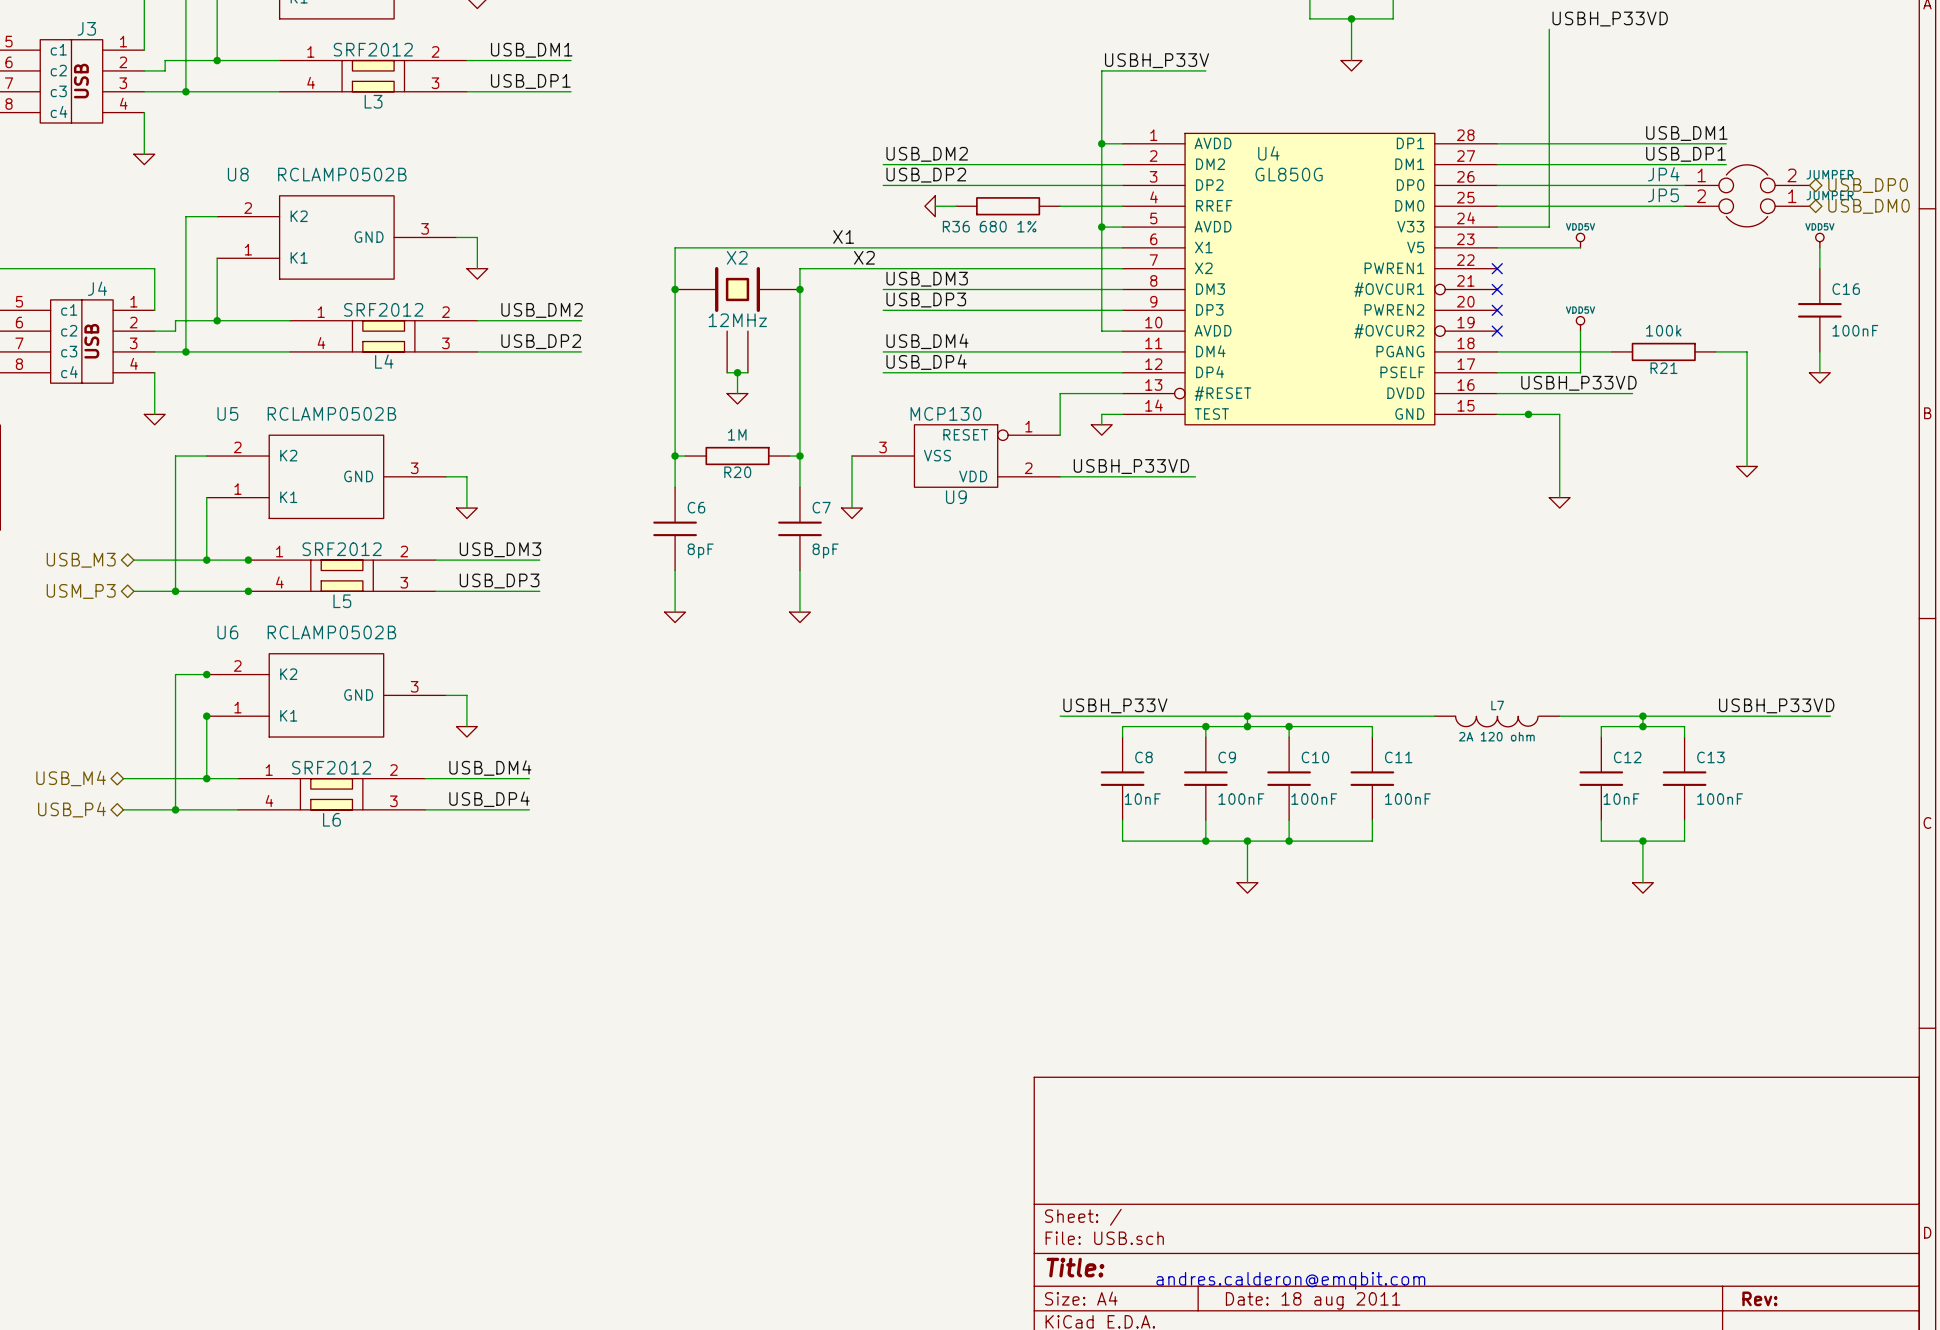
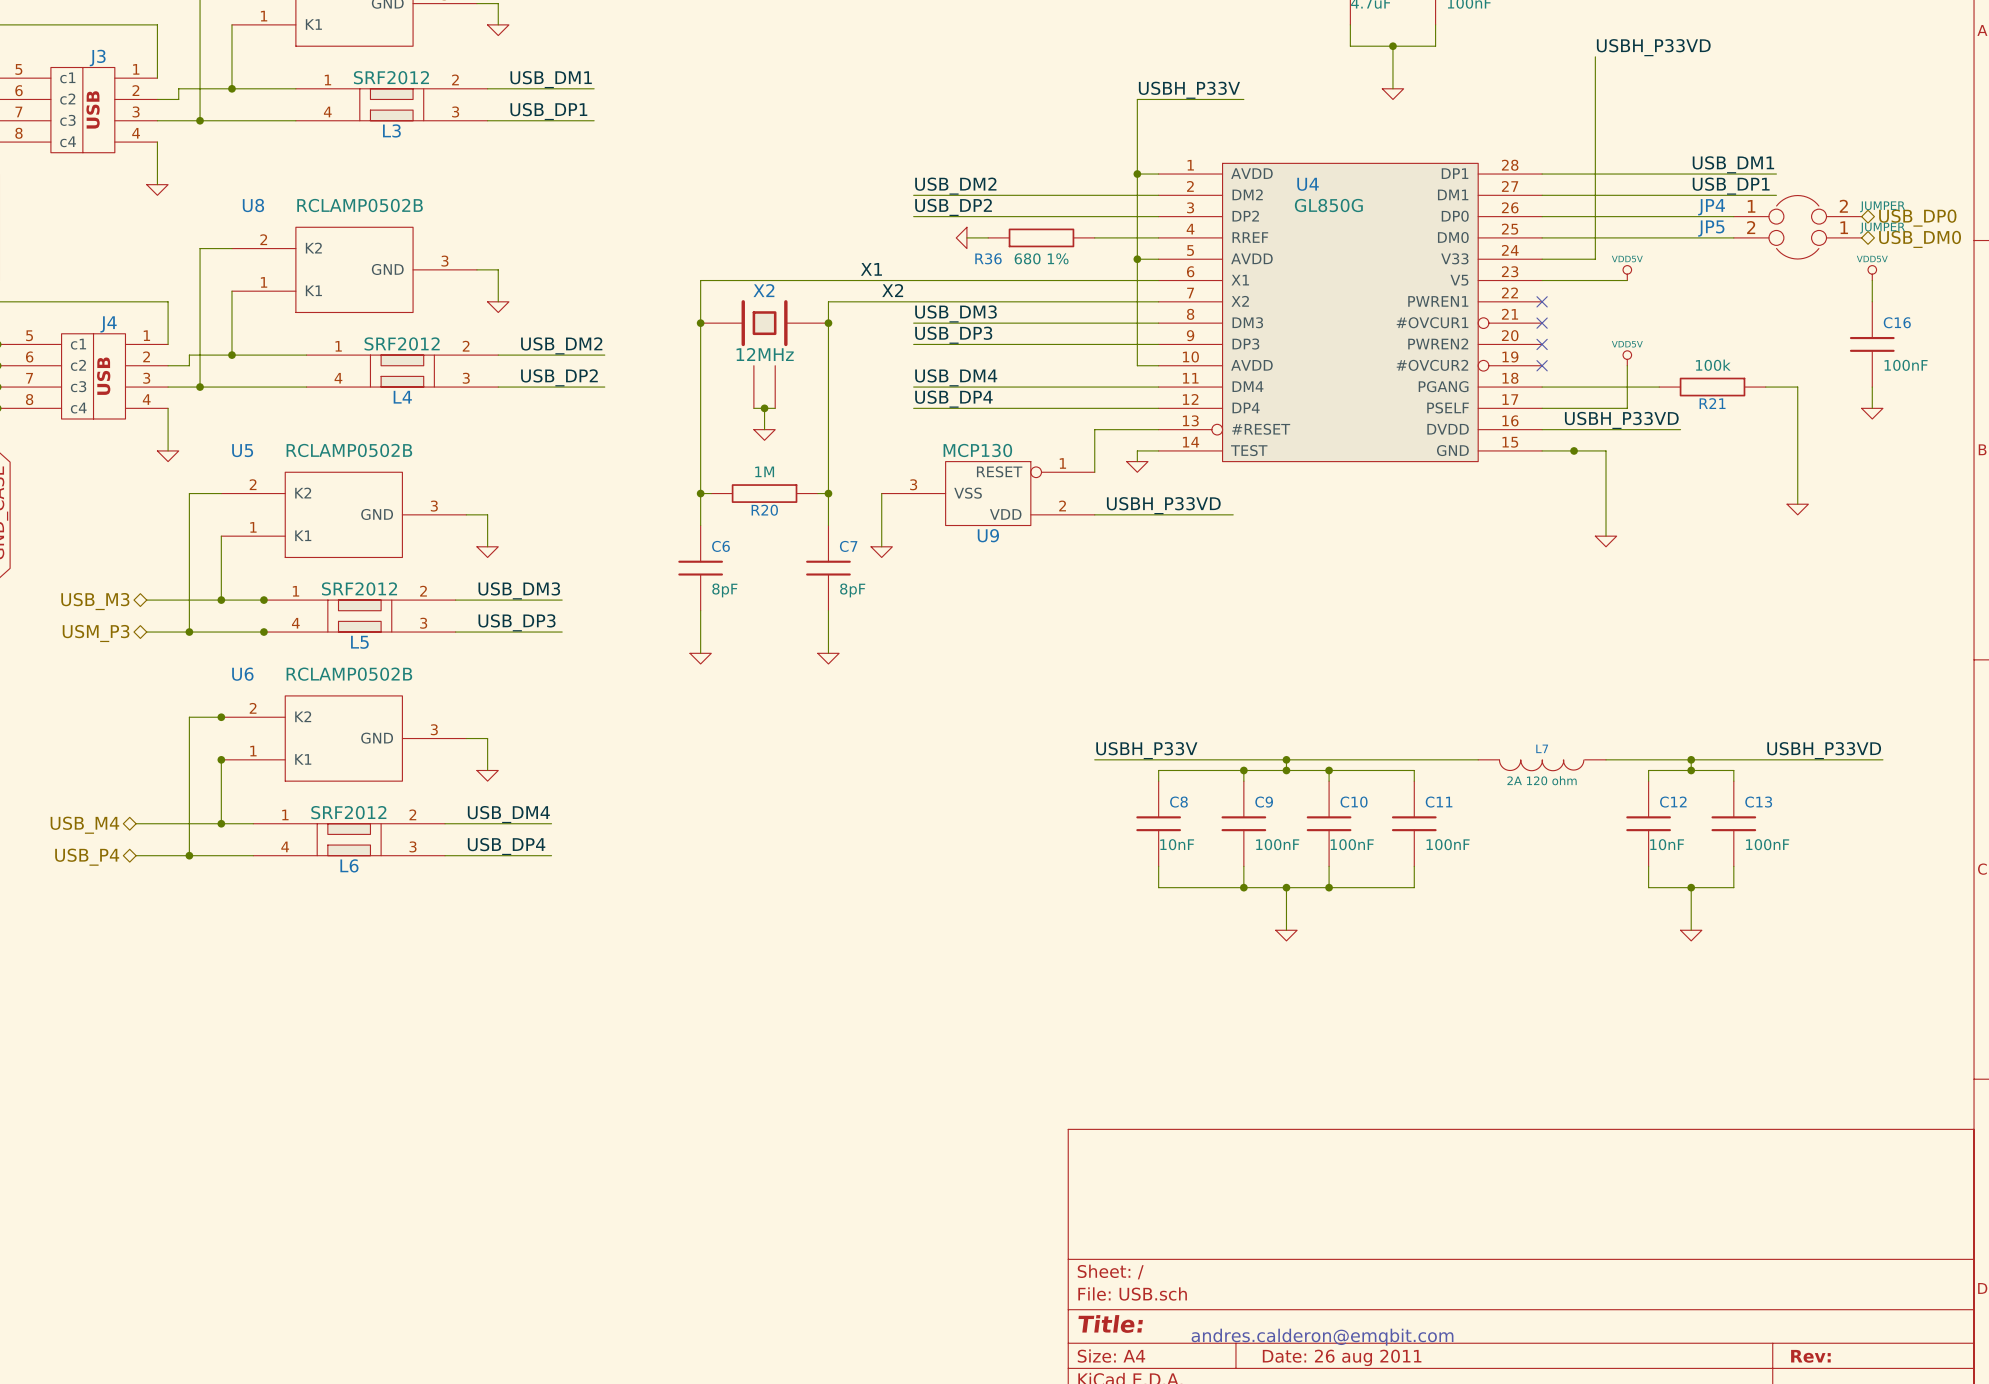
title block: Date: 18 aug 2011 (1313, 1300) -> Date: 26 aug 2011 (1342, 1357)

